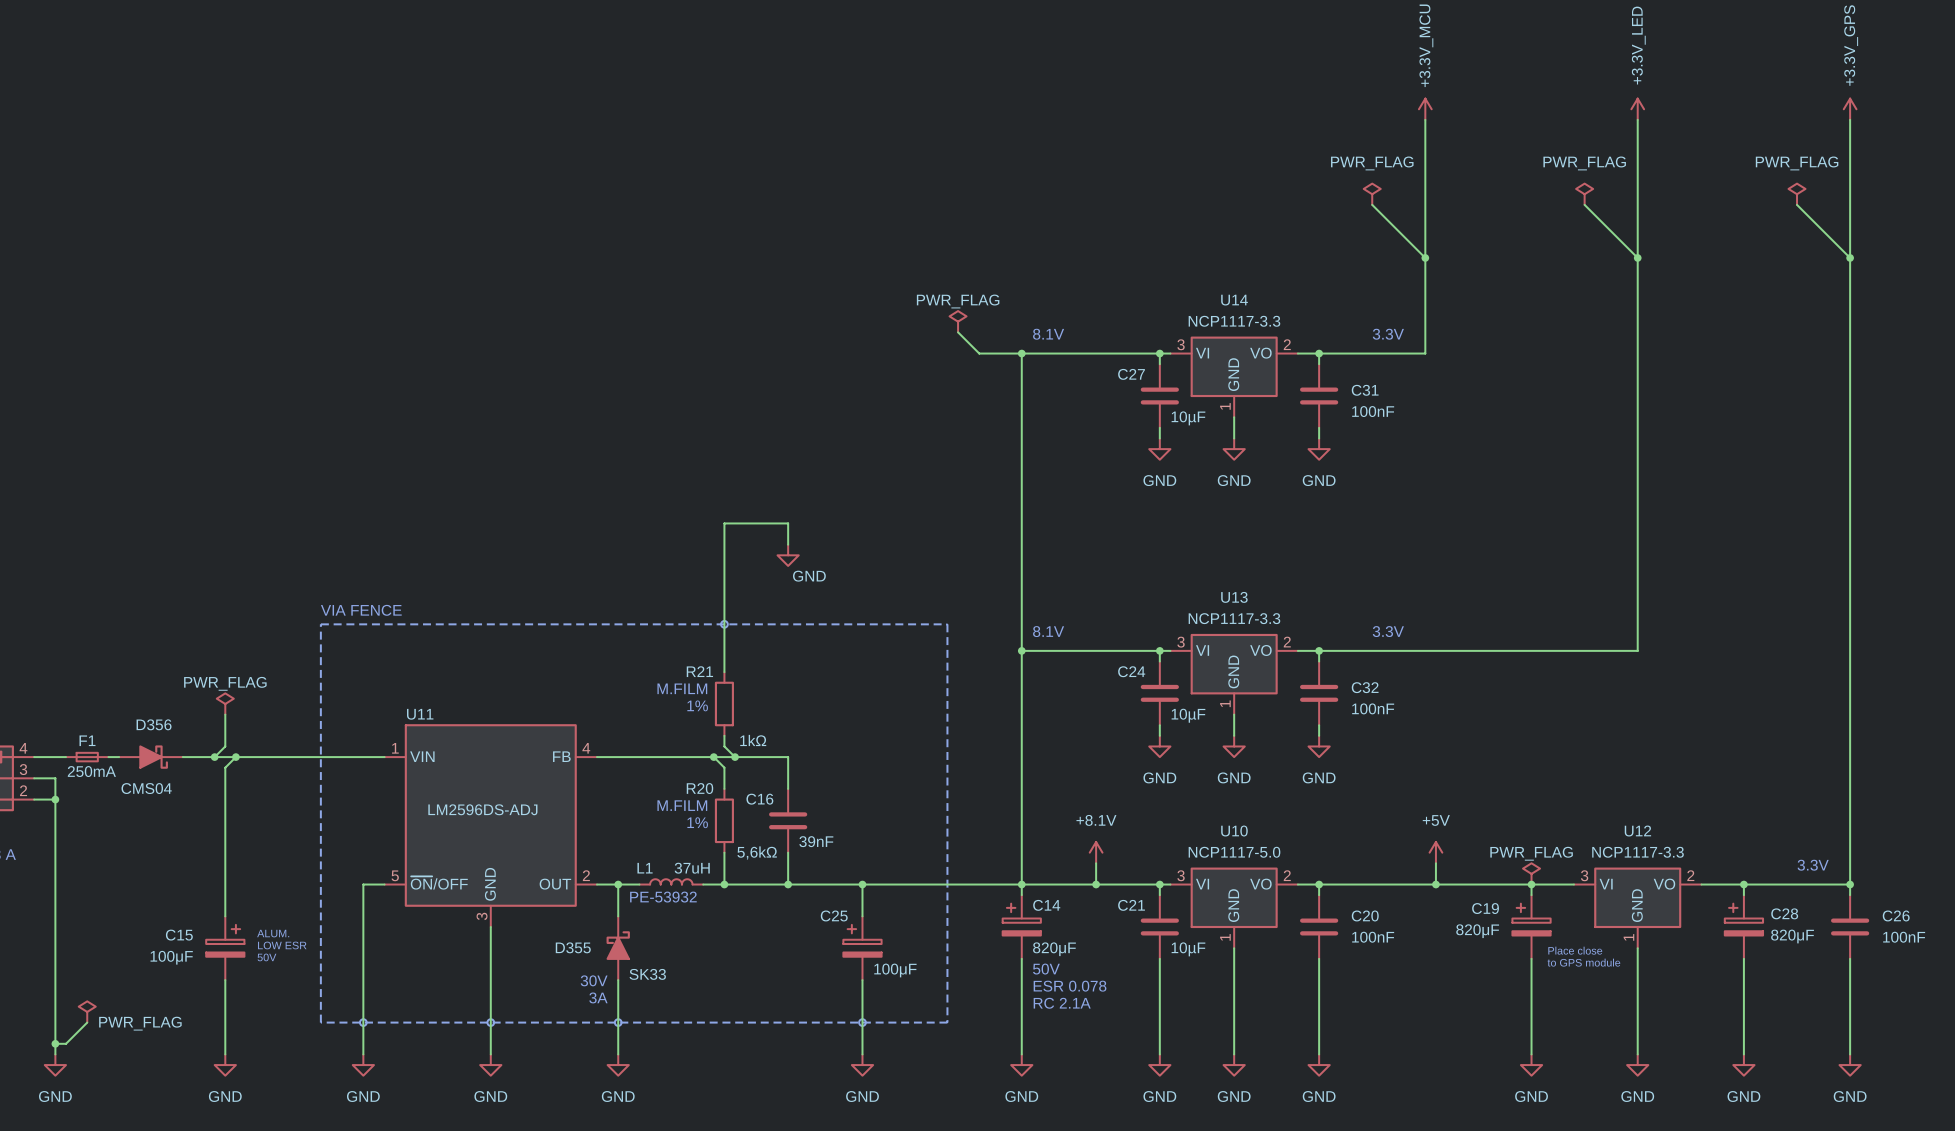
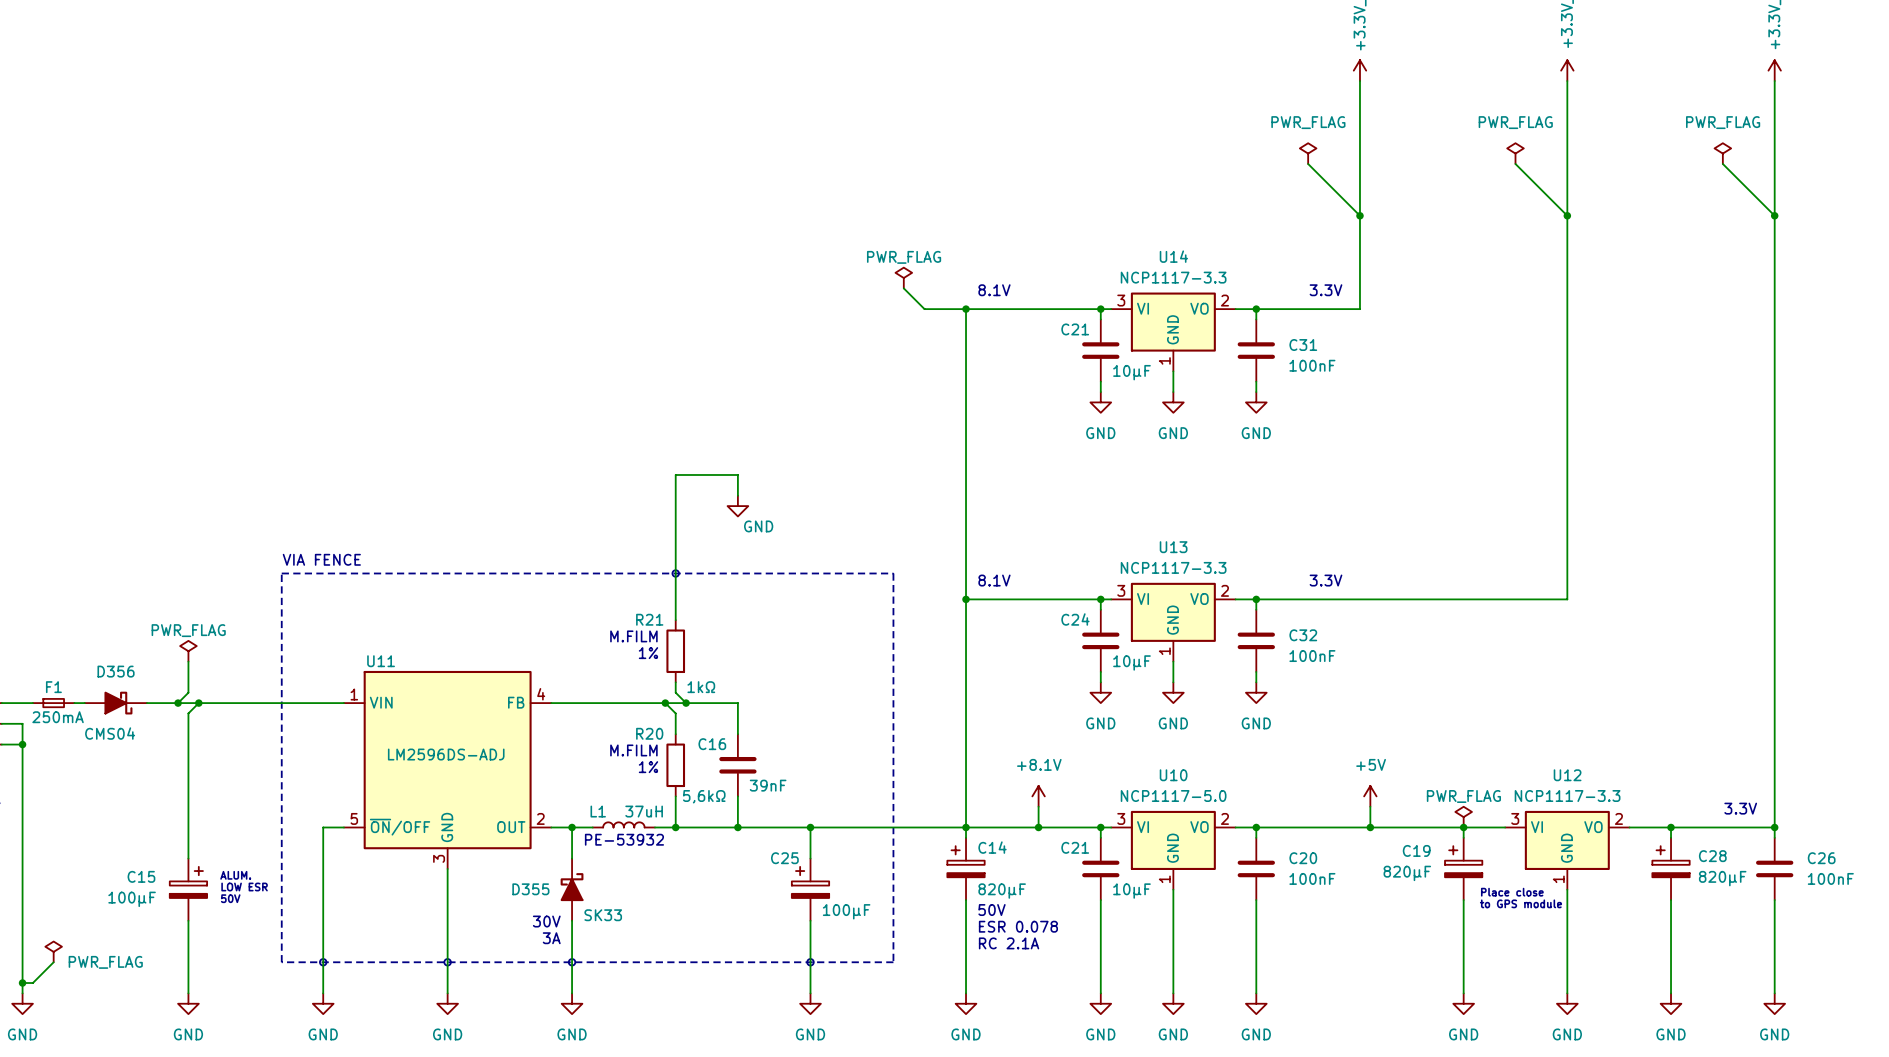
C27 name: C27 (1131, 374) -> C21 (1075, 329)

